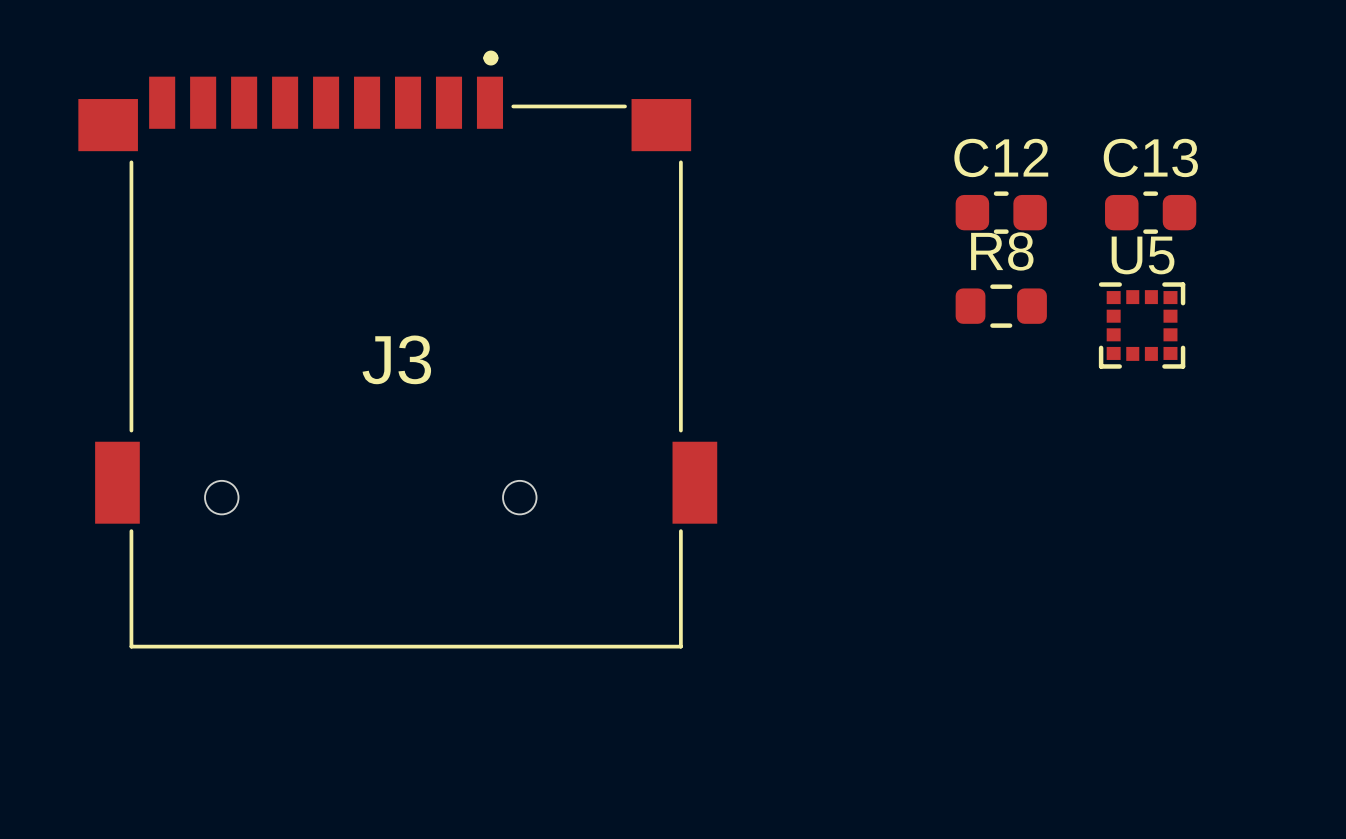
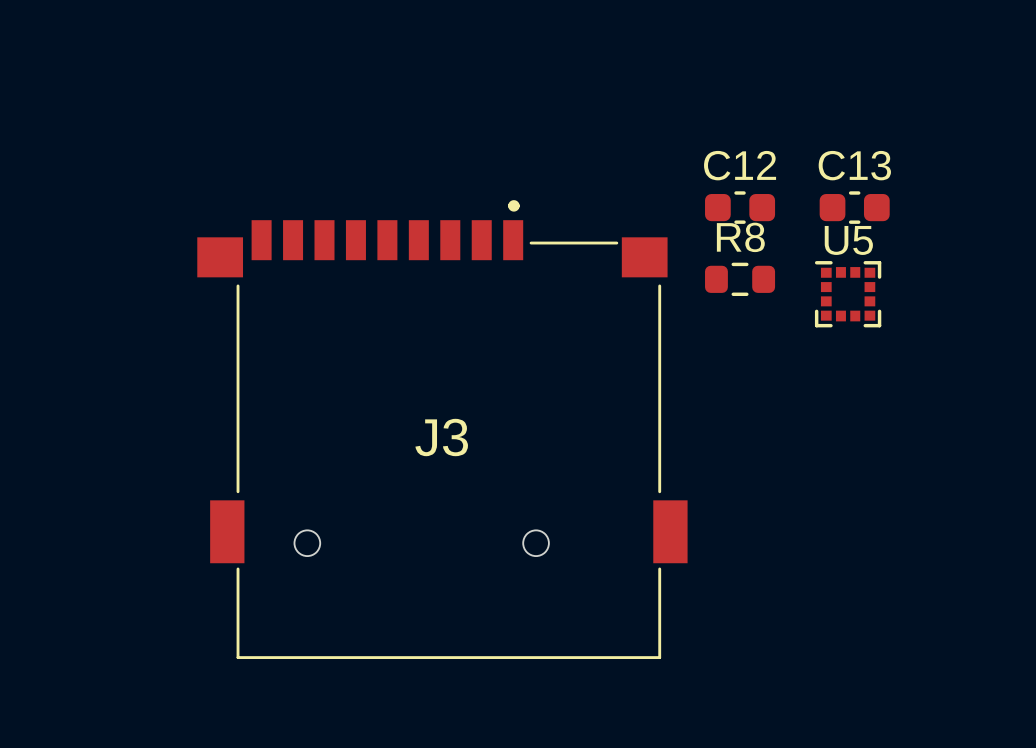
J3 position: (397, 349) -> (442, 429)

